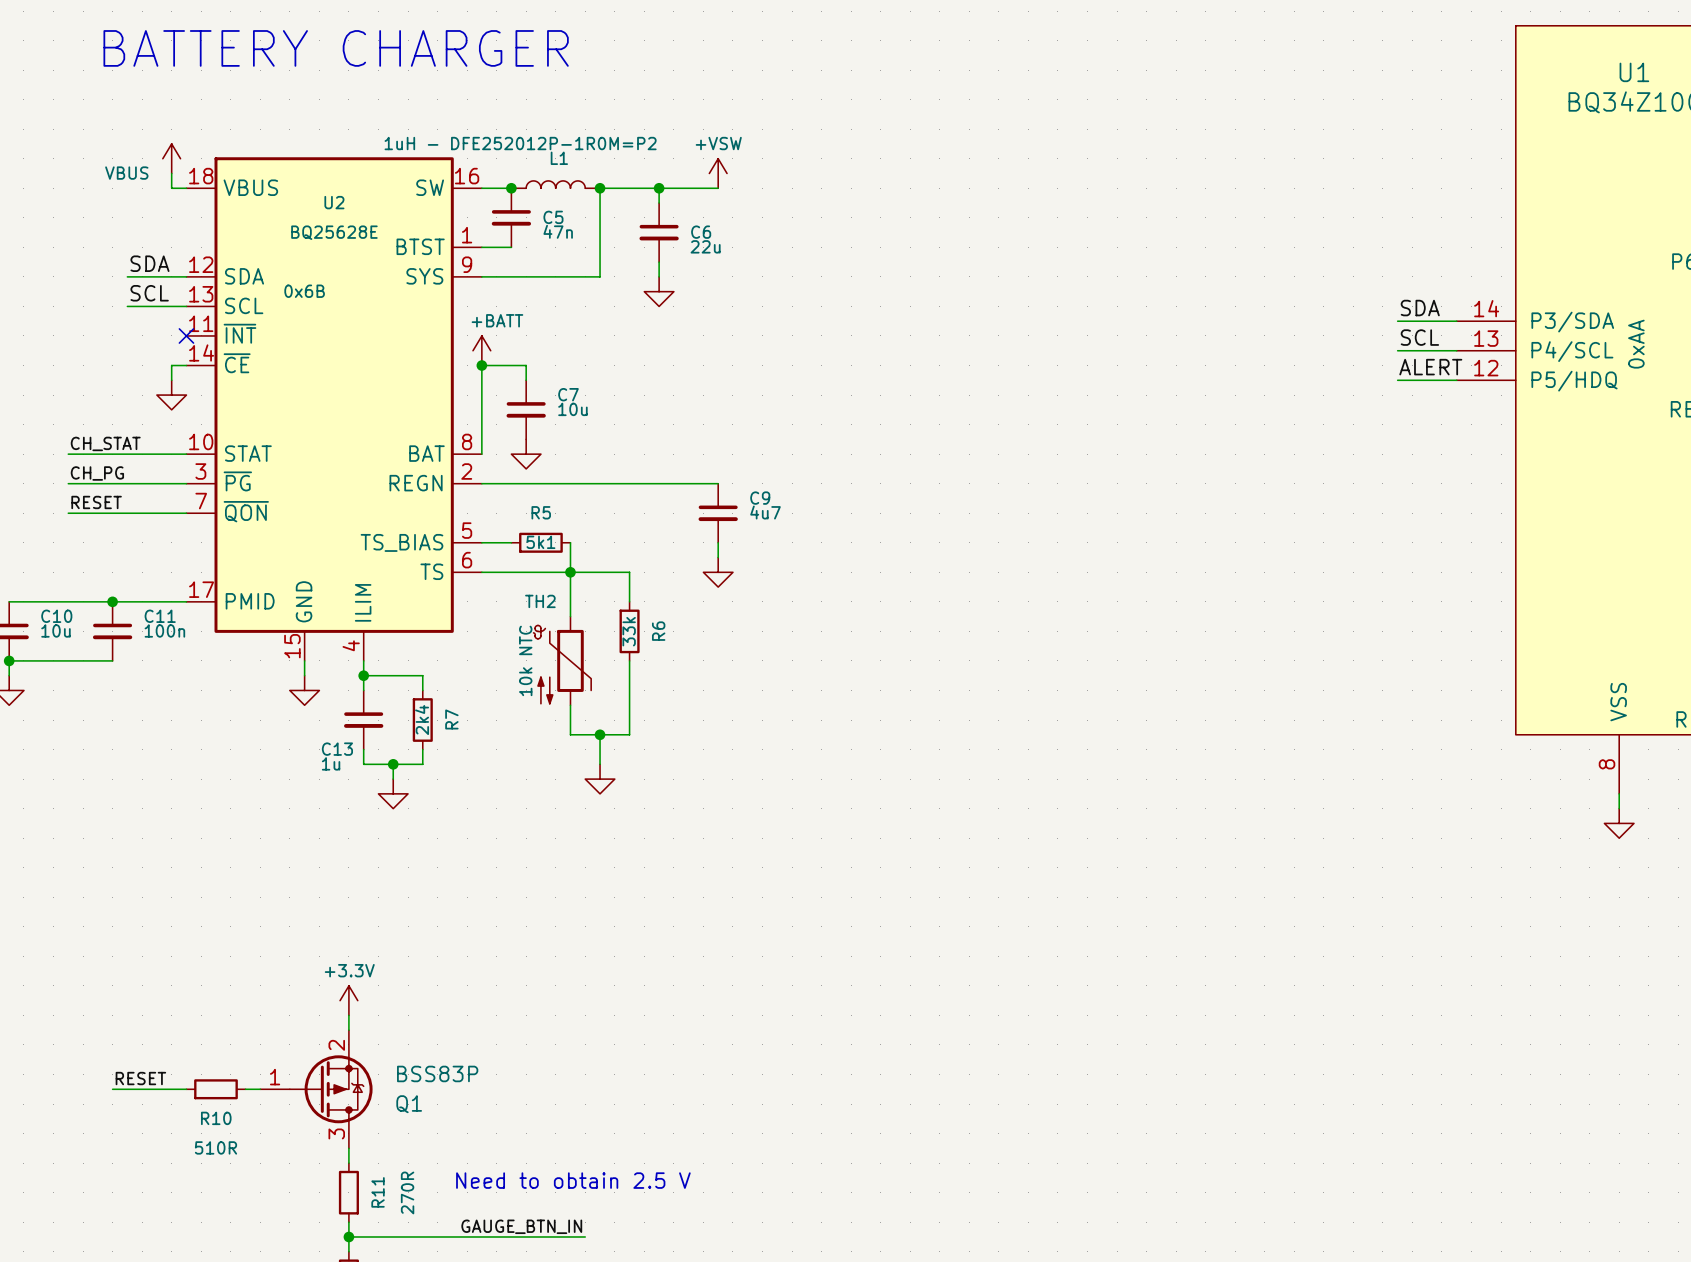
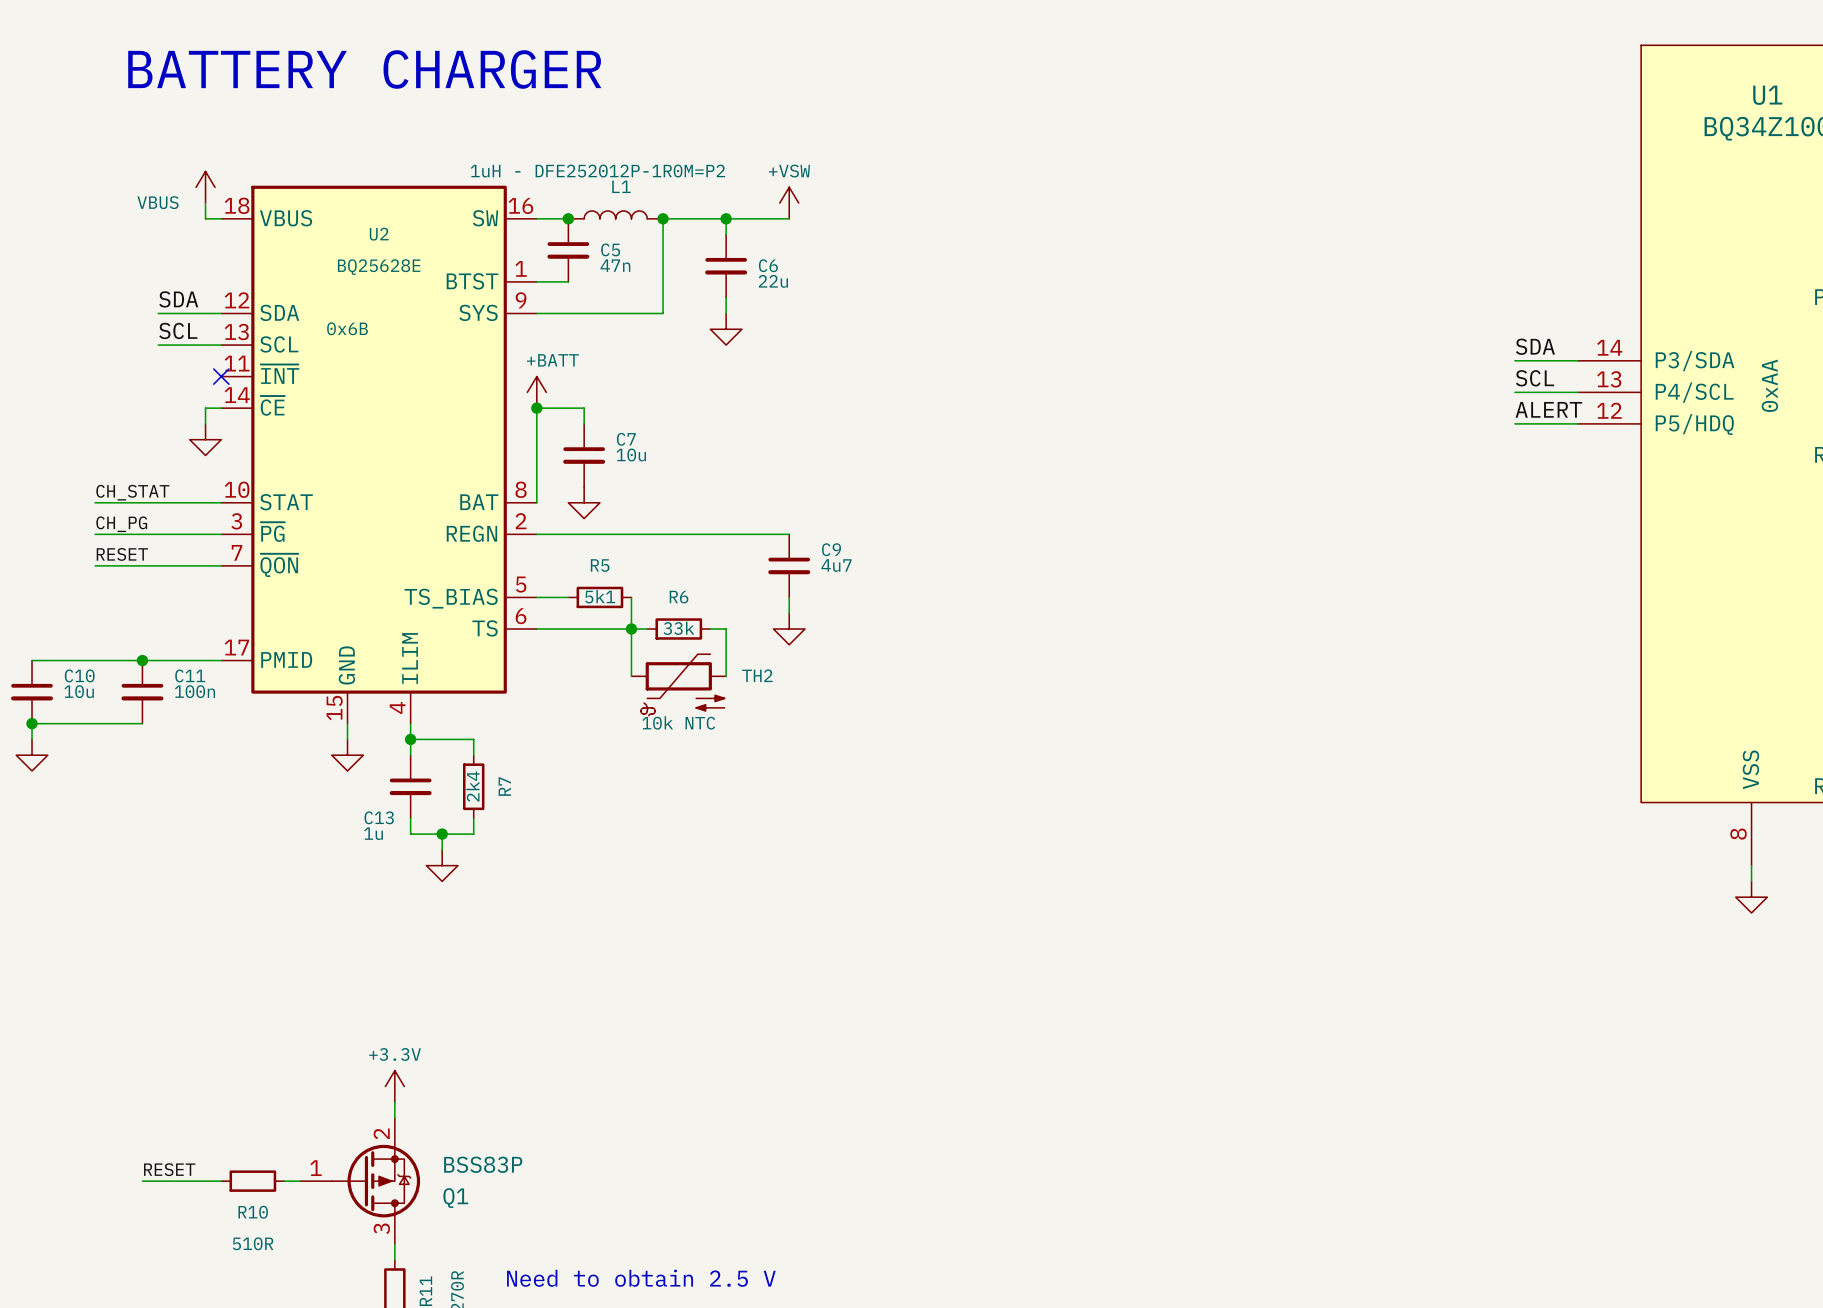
wire: (585, 572) (629, 572) (629, 601) -> none
wire: none -> (710, 629) (726, 629) (726, 676)
TH2 name position: TH2 (540, 601) -> TH2 (757, 675)
R6 rotation: 0° (629, 631) -> 90° clockwise (678, 629)
R6 position: (629, 631) -> (678, 629)
R6 name position: R6 (658, 631) -> R6 (679, 597)
TH2 position: (562, 660) -> (678, 685)
wire: (629, 660) (629, 734) (570, 734) (570, 705) -> none
TH2 rotation: 0° (562, 664) -> 90° counterclockwise (682, 685)
wire: (600, 734) (600, 764) -> none
junction: (600, 734) -> none
power symbol: (600, 779) -> none

